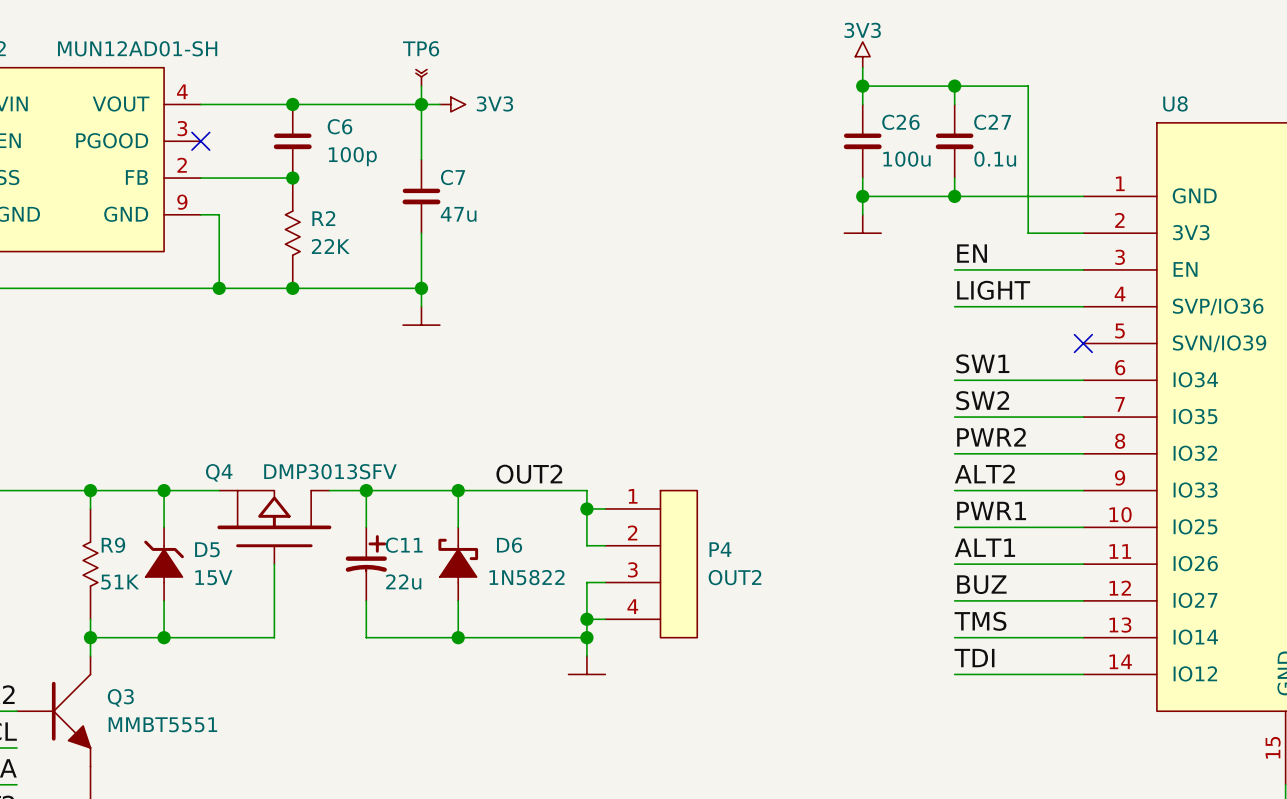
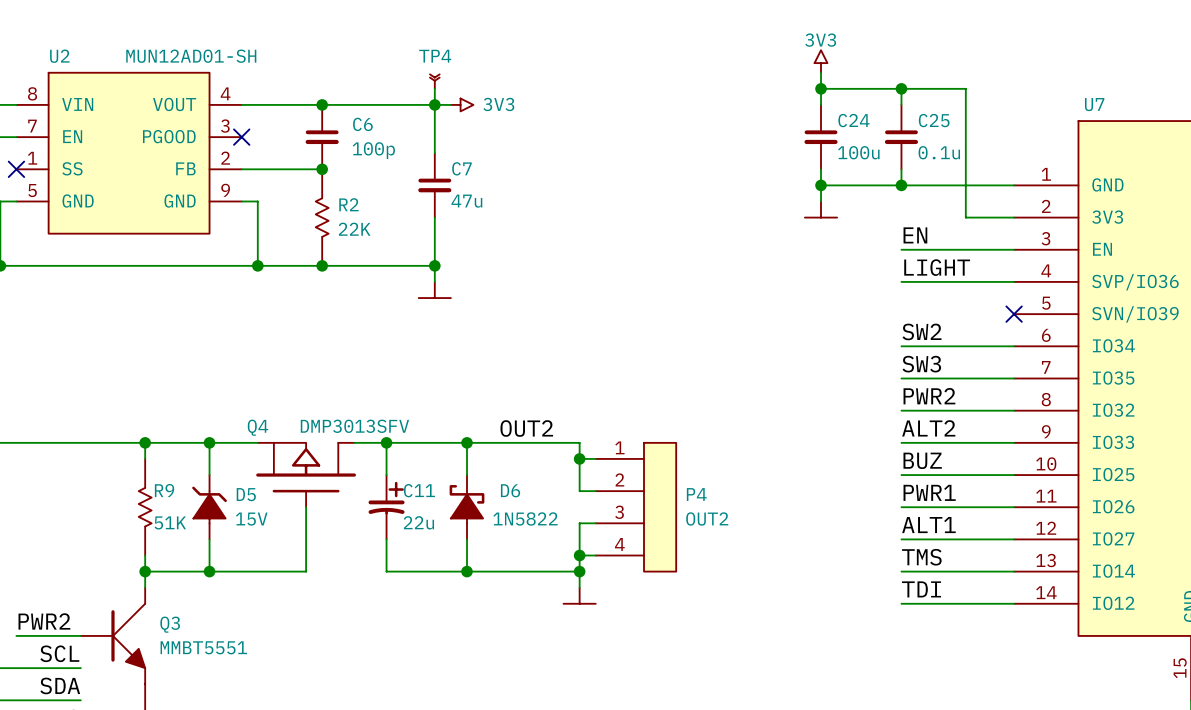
TP6 name: TP6 (421, 48) -> TP4 (435, 56)
U8 name: U8 (1175, 103) -> U7 (1094, 104)
C26 name: C26 (900, 122) -> C24 (853, 120)
C27 name: C27 (992, 122) -> C25 (934, 120)
label: SW1 (982, 363) -> SW2 (922, 331)
label: SW2 (982, 400) -> SW3 (921, 364)
label: PWR1 (991, 510) -> BUZ (922, 460)
label: ALT1 (984, 547) -> PWR1 (929, 492)
label: BUZ (981, 584) -> ALT1 (928, 525)

